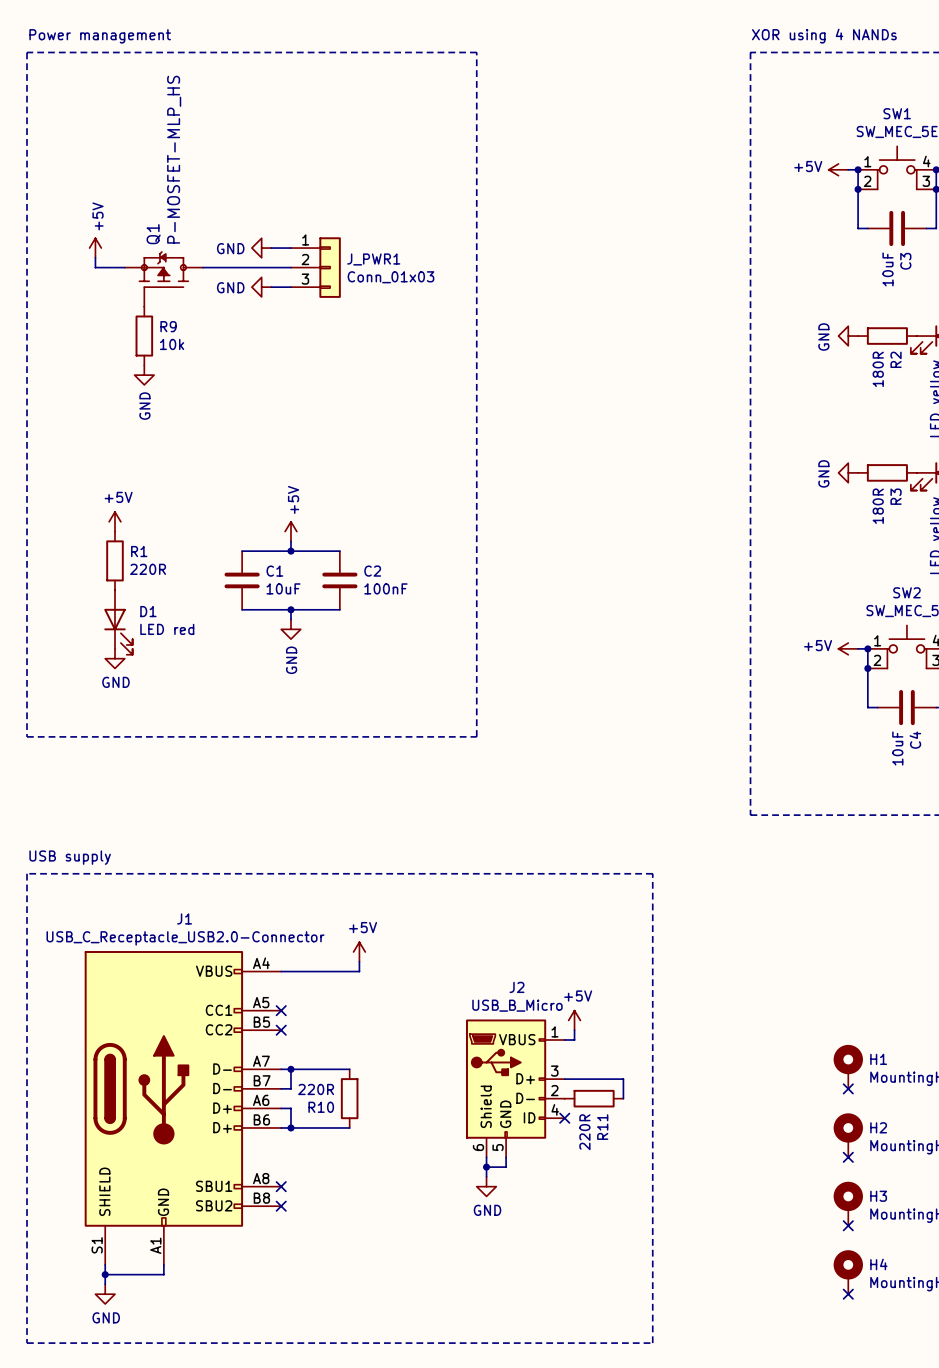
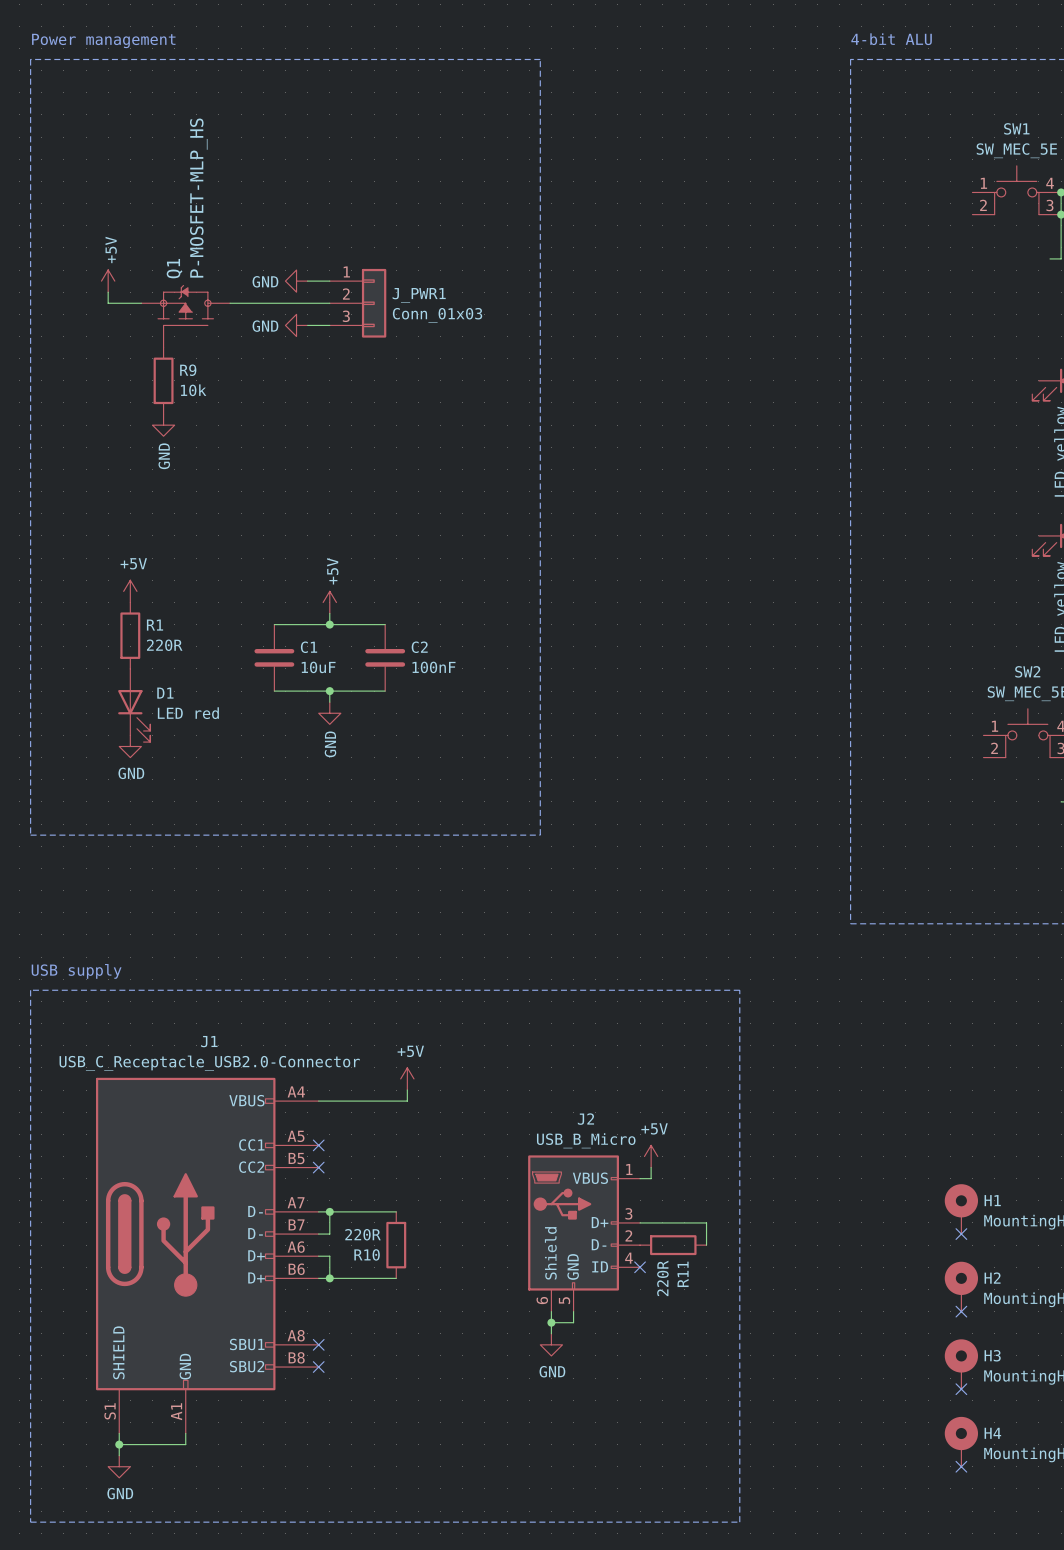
text: XOR using 4 NANDs (824, 36) -> 4-bit ALU (891, 39)
power symbol: +5V (838, 169) -> none
wire: (848, 169) (858, 169) (858, 228) (867, 228) -> none
junction: (858, 169) -> none
junction: (858, 189) -> none
C3: 10uF (897, 228) -> none
power symbol: GND (848, 336) -> none
R2: 180R (887, 336) -> none
power symbol: GND (848, 472) -> none
R3: 180R (887, 472) -> none
power symbol: +5V (848, 648) -> none
wire: (858, 648) (867, 648) (867, 707) (877, 707) -> none
junction: (867, 648) -> none
junction: (867, 668) -> none
C4: 10uF (906, 707) -> none

